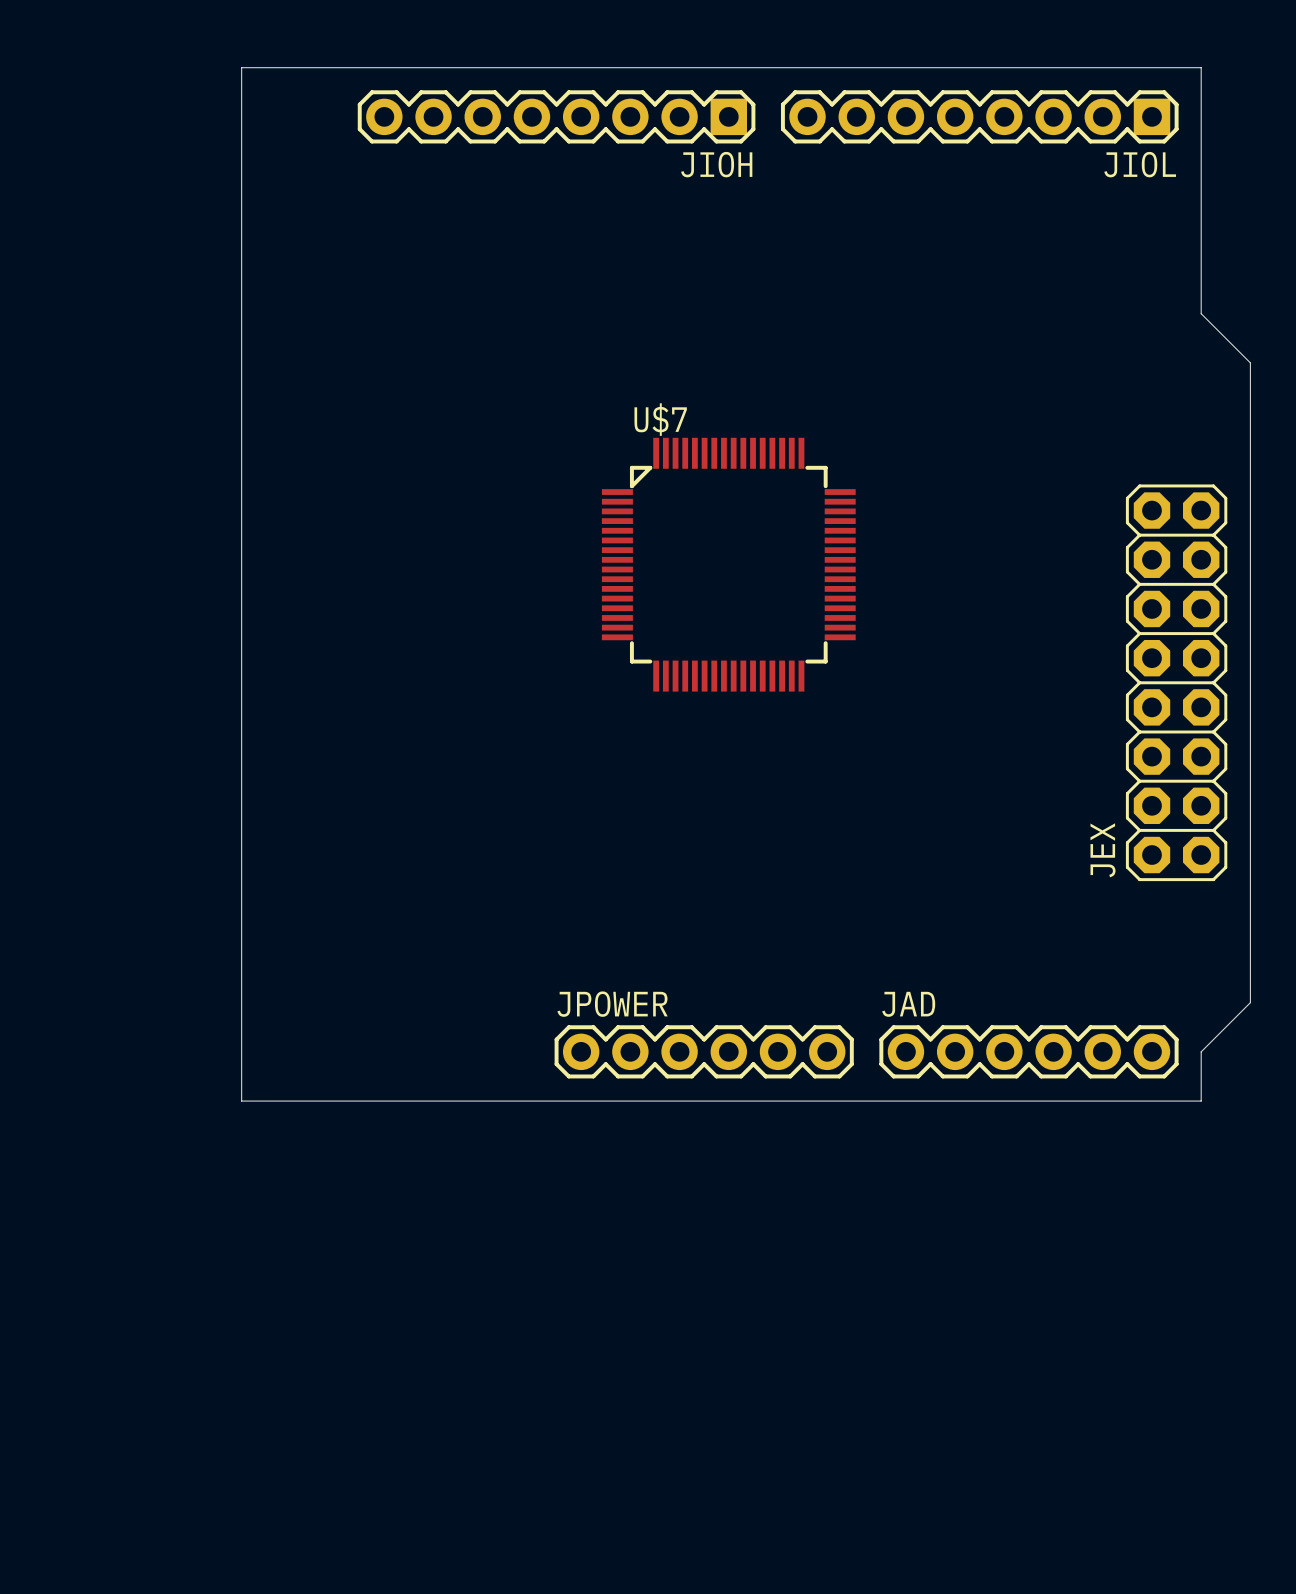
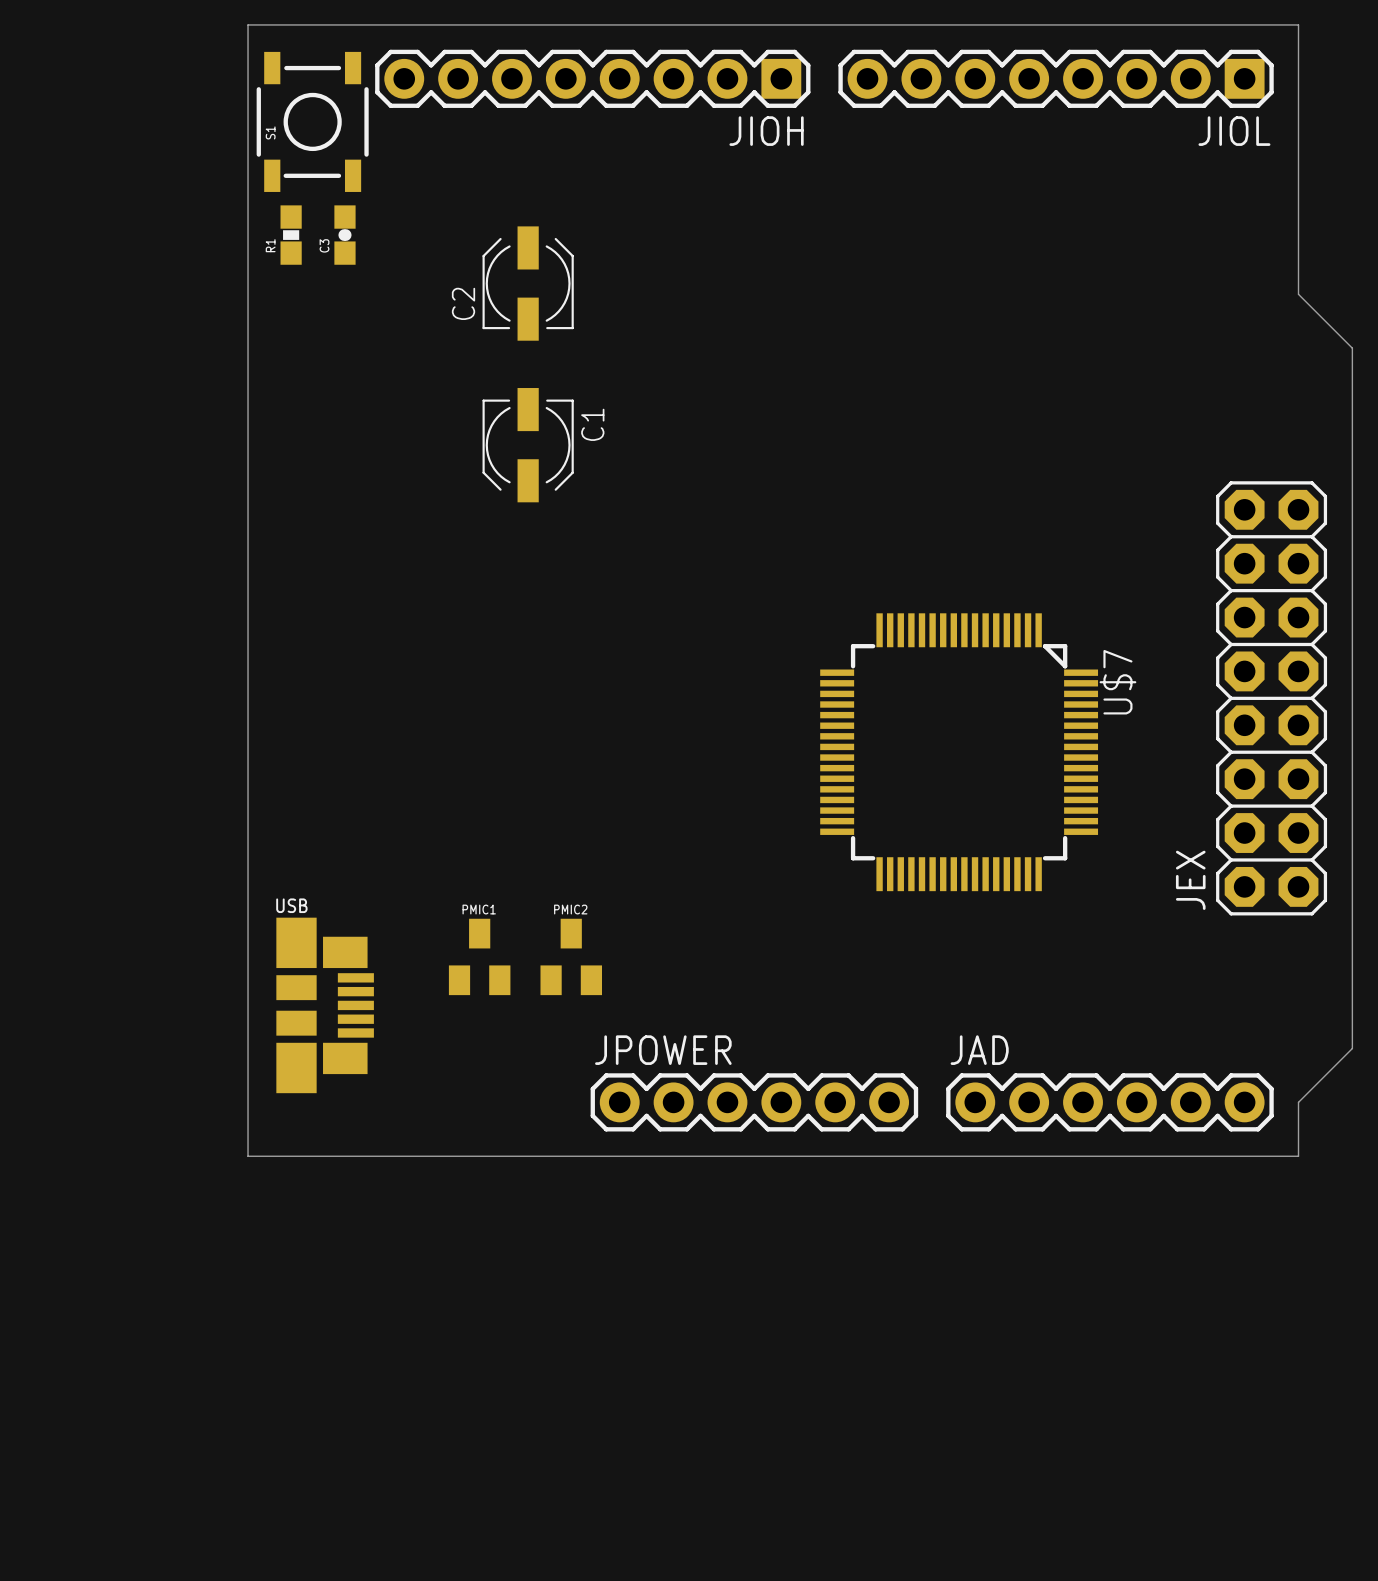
S1: none -> (312, 121)
R1: none -> (291, 235)
C3: none -> (344, 235)
C2: none -> (528, 283)
C1: none -> (528, 445)
U$7 rotation: 0° (728, 564) -> 90° clockwise (959, 752)
U$7 position: (728, 564) -> (959, 752)
PMIC1: none -> (479, 956)
PMIC2: none -> (571, 956)
USB: none -> (325, 1005)

